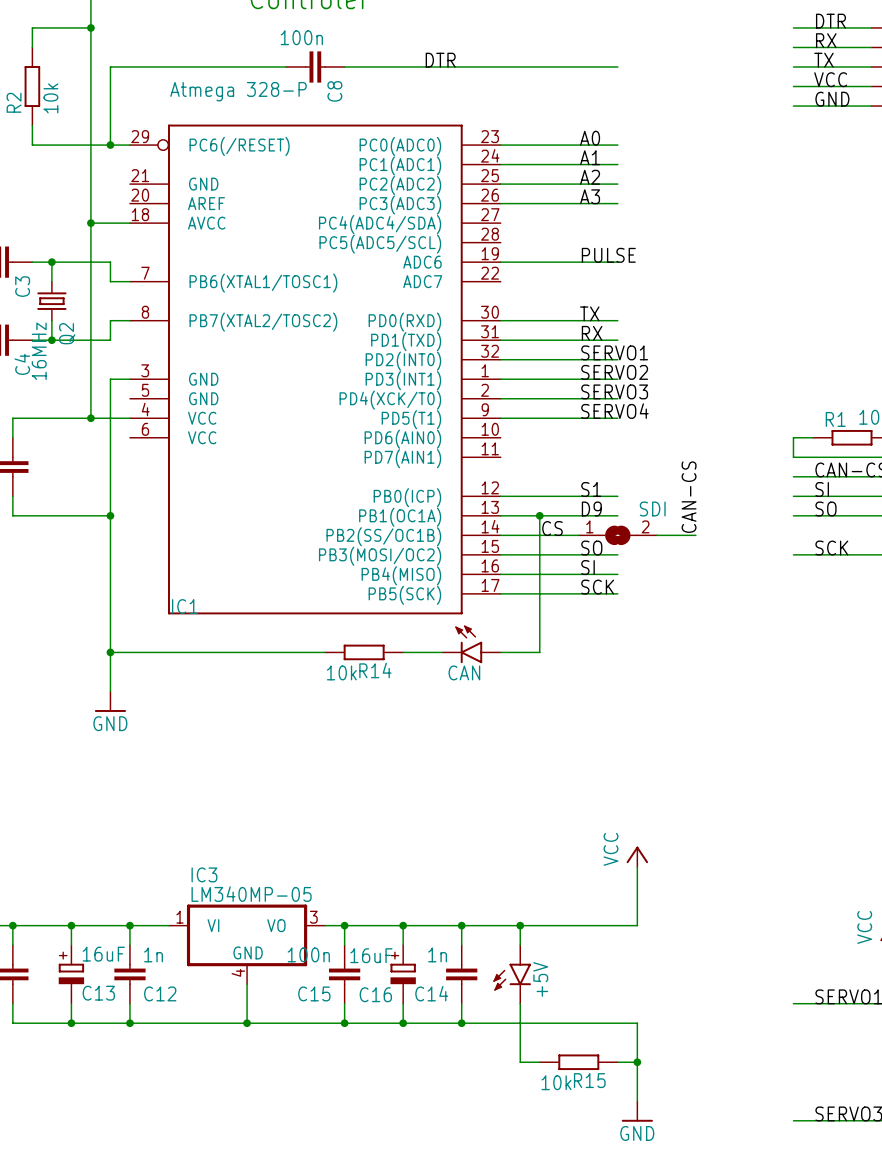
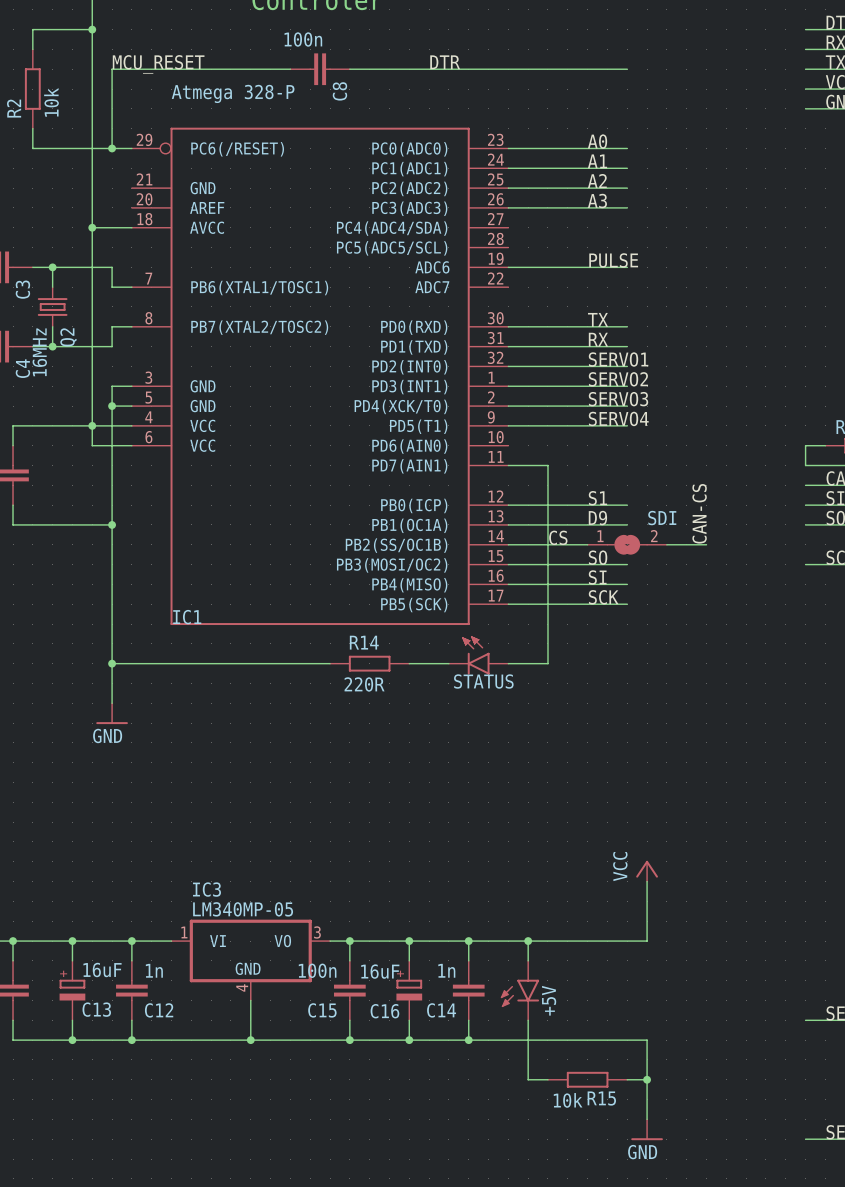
label: none -> MCU_RESET (158, 64)
wire: none -> (112, 406) (131, 406)
junction: none -> (112, 406)
wire: none -> (92, 425) (92, 445) (131, 445)
wire: none -> (508, 465) (547, 465) (547, 524)
junction: (539, 515) -> none
CAN: (471, 644) -> none
part: none -> STATUS (478, 655)
R14 name position: R14 (375, 670) -> R14 (364, 642)
R14 value: 10k (341, 672) -> 220R (364, 684)

